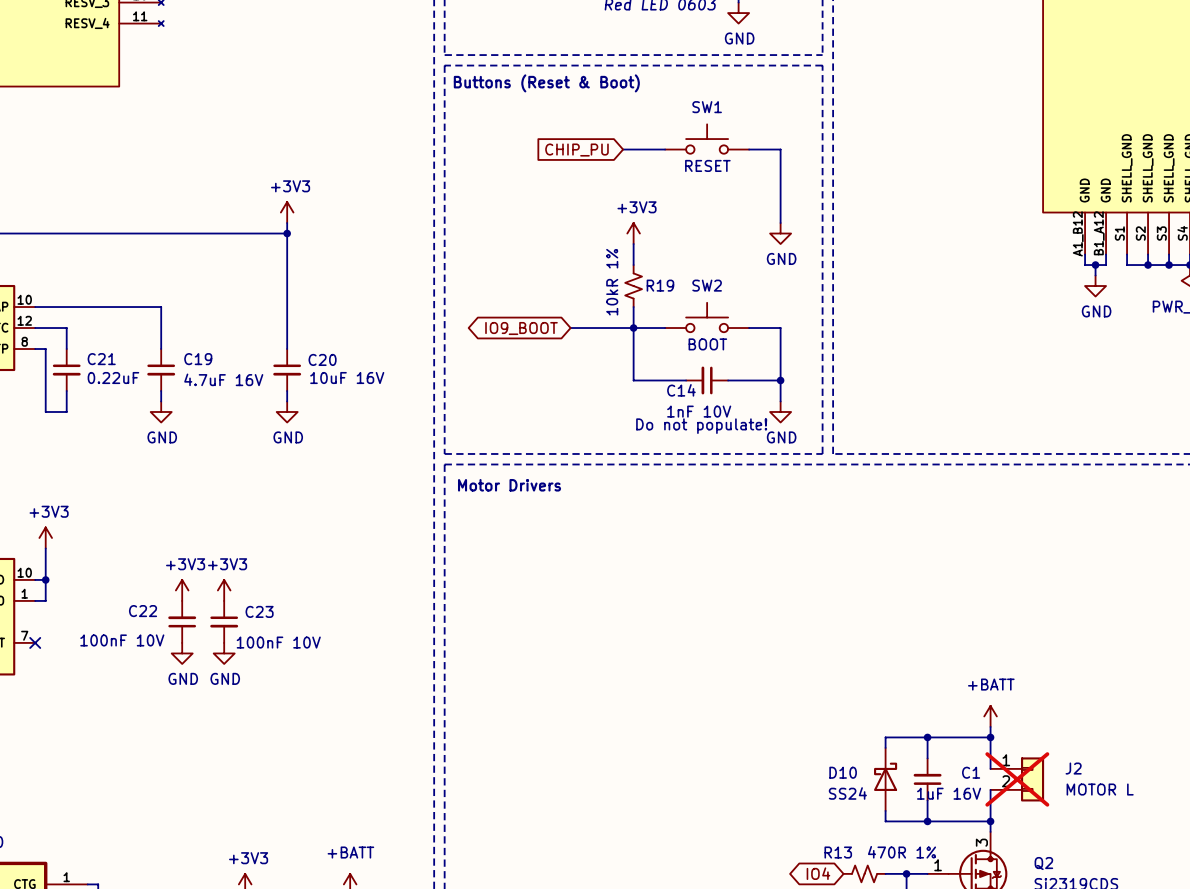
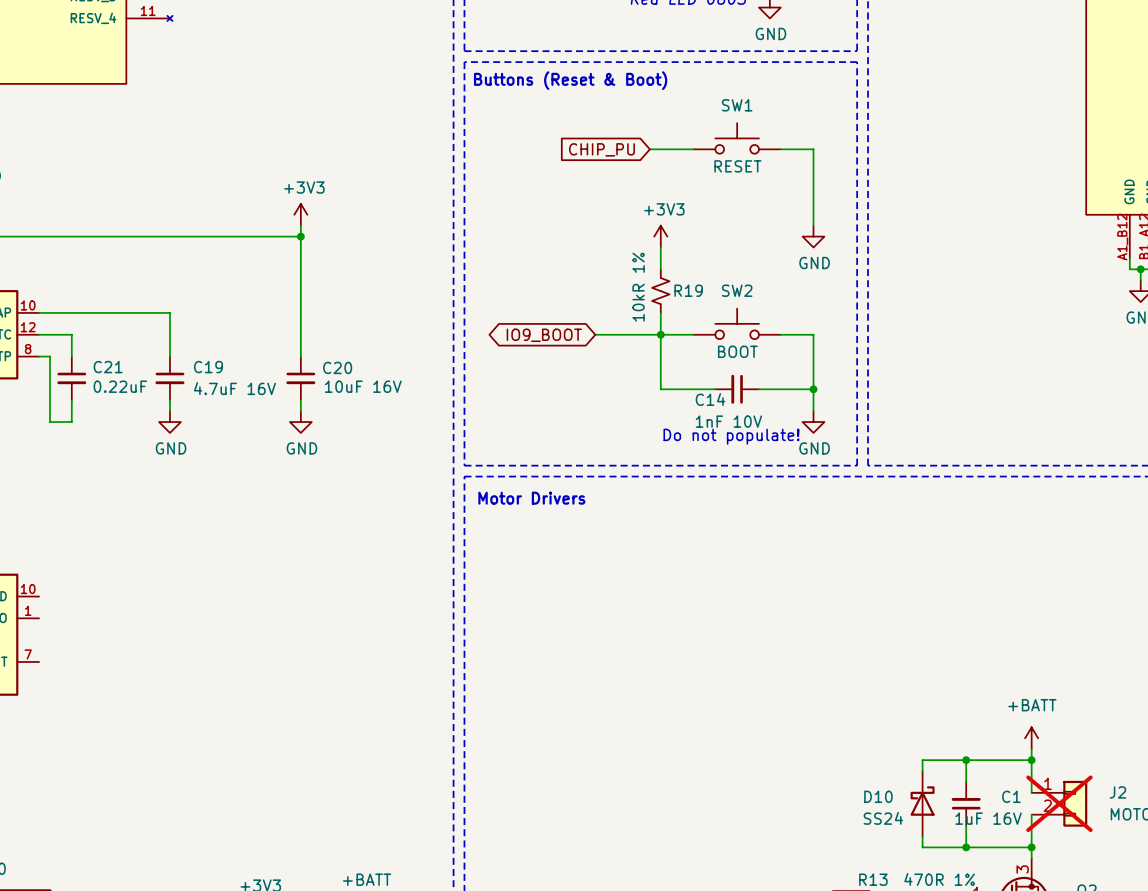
power symbol: +3V3 (45, 537) -> none
wire: (45, 548) (45, 600) (35, 600) -> none
wire: (35, 579) (45, 579) -> none
junction: (45, 579) -> none
power symbol: +3V3 (182, 590) -> none
power symbol: +3V3 (224, 590) -> none
C22: 100nF 10V (182, 621) -> none
C23: 100nF 10V (224, 621) -> none
no-connect mark: (35, 642) -> none
power symbol: GND (182, 653) -> none
power symbol: GND (224, 653) -> none

